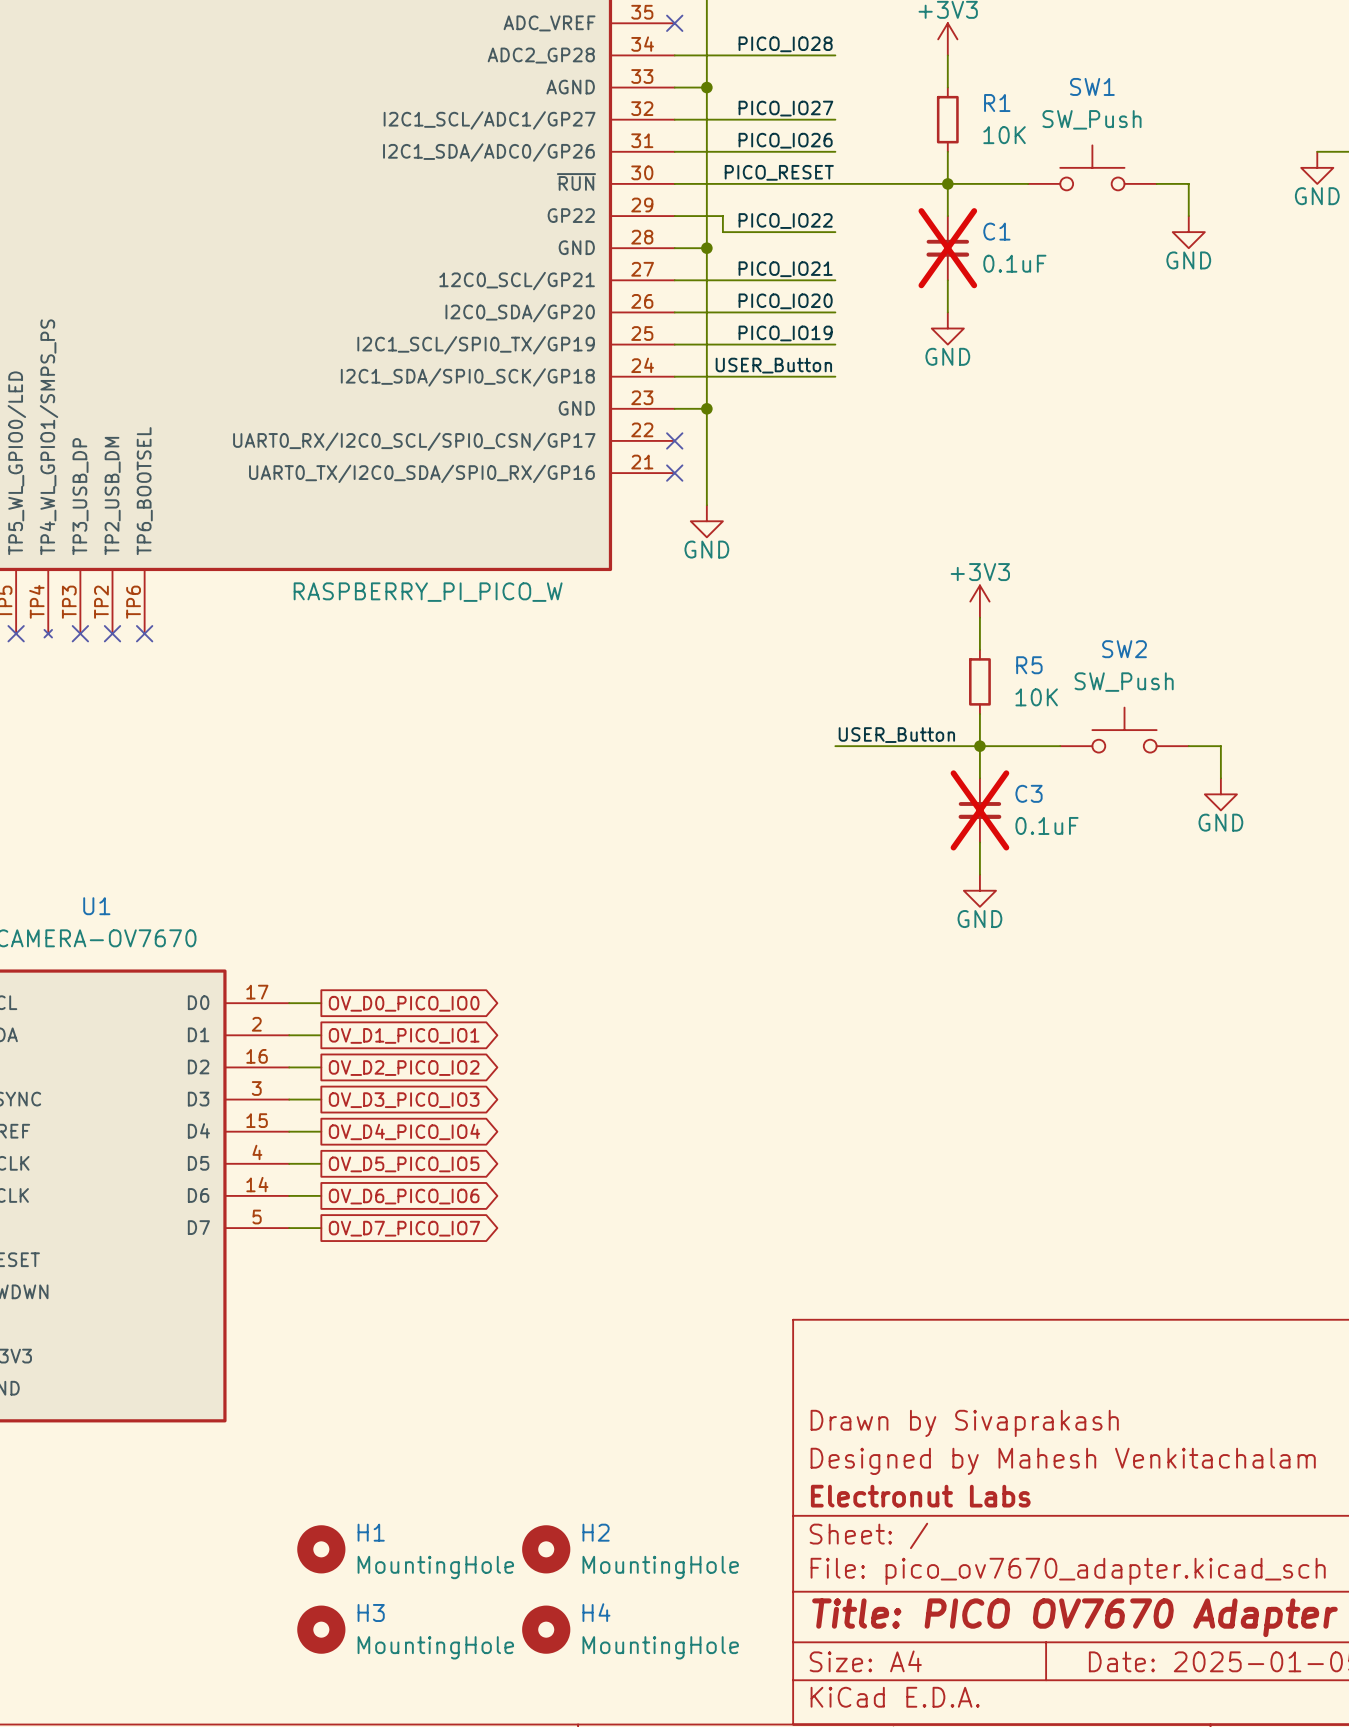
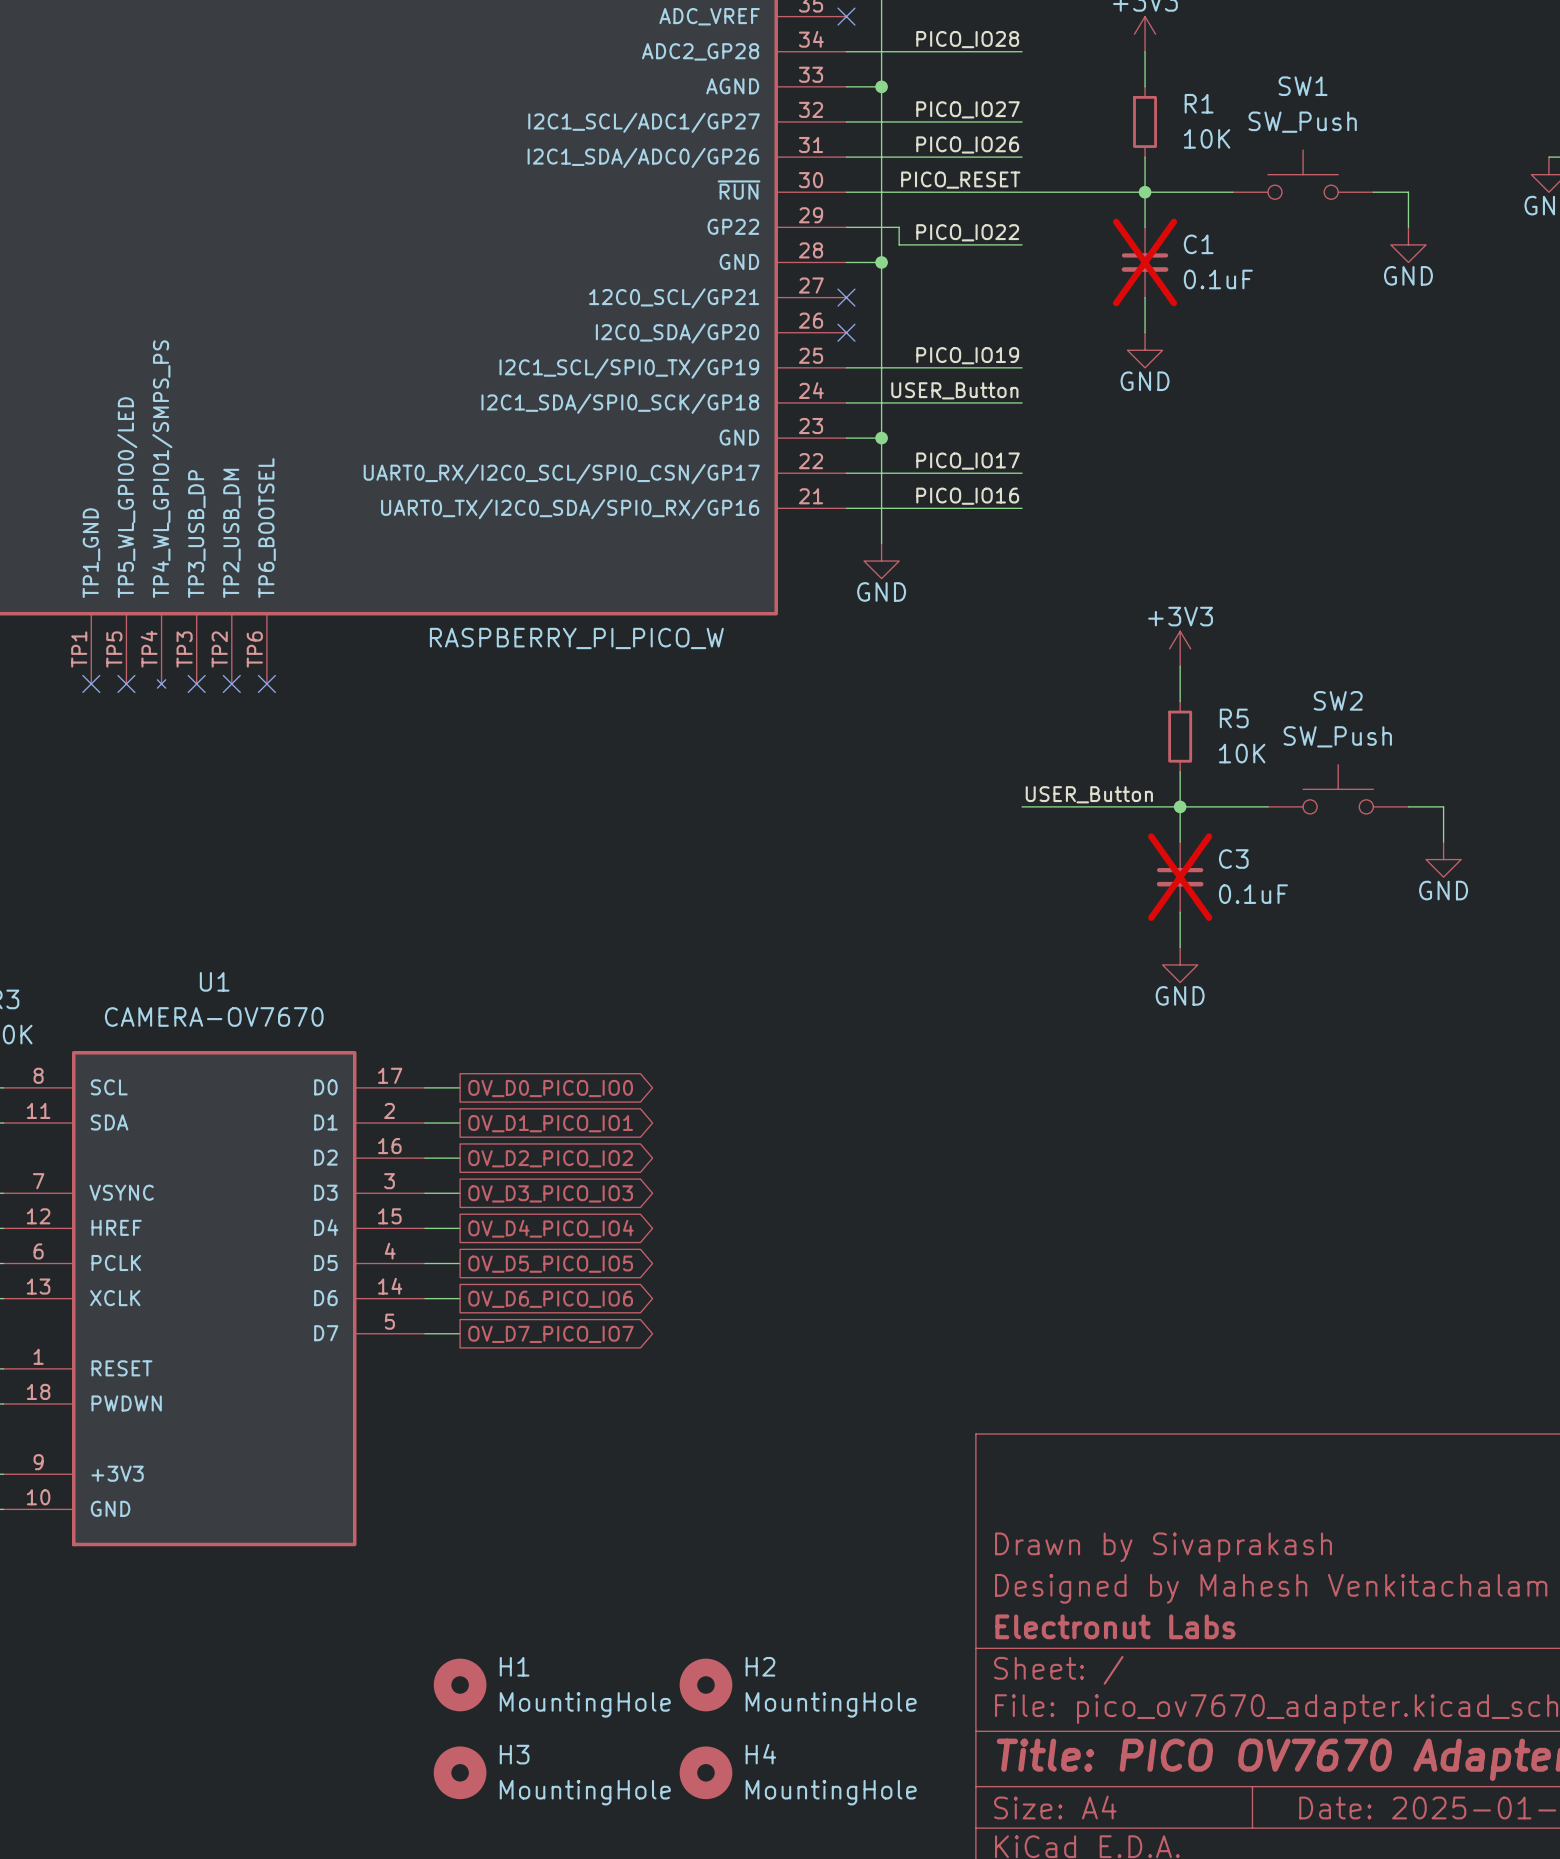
label: PICO_IO21 (785, 269) -> none
wire: (674, 280) (835, 280) -> (846, 508) (1022, 508)
no-connect mark: none -> (846, 297)
label: PICO_IO20 (785, 301) -> none
wire: (674, 312) (835, 312) -> (846, 473) (1022, 473)
no-connect mark: none -> (846, 332)
label: none -> PICO_IO17 (968, 461)
no-connect mark: (674, 440) -> none
label: none -> PICO_IO16 (967, 496)
no-connect mark: (674, 473) -> none

